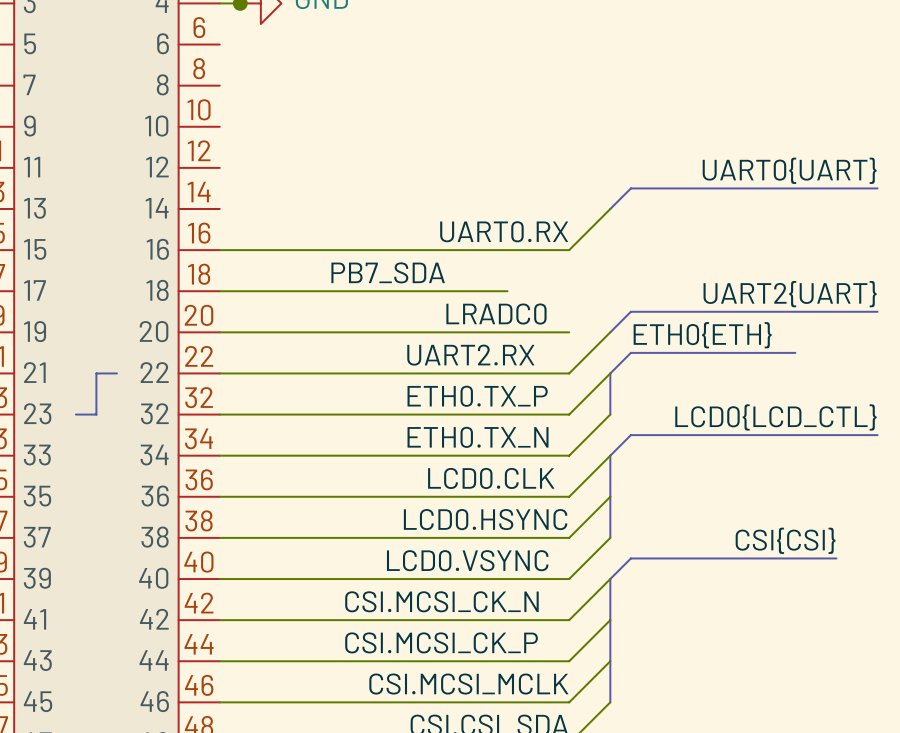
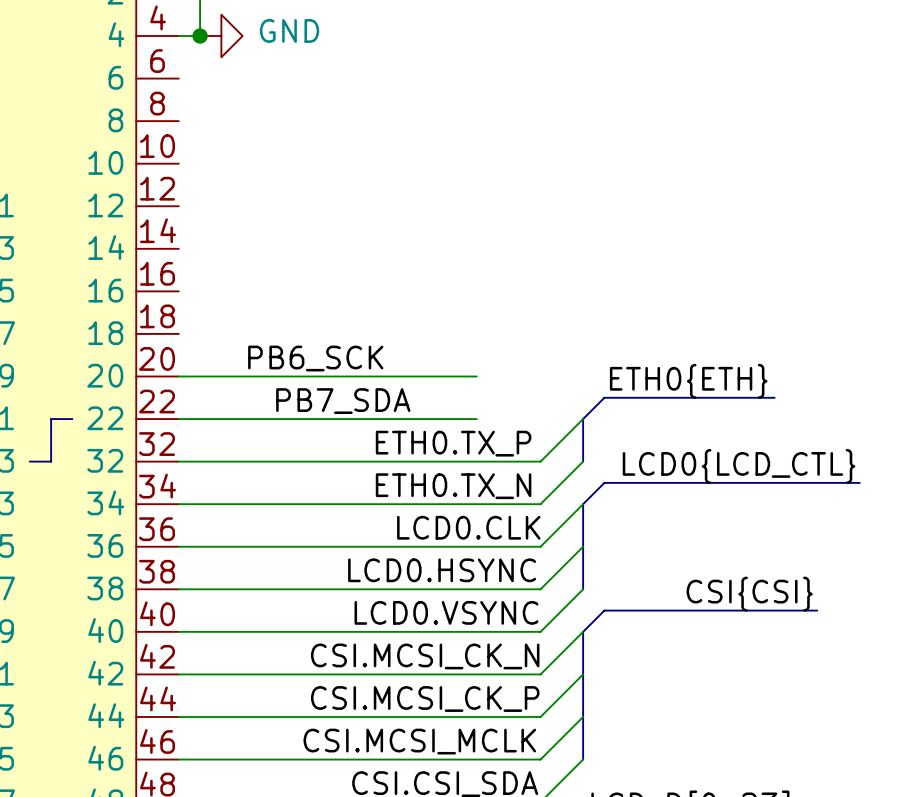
label: UART0{UART} (789, 170) -> none
bus: (877, 188) (630, 188) (610, 209) -> none
wire: (610, 209) (569, 250) (219, 250) -> none
label: UART0.RX (504, 231) -> none
label position: PB7_SDA (388, 272) -> PB7_SDA (343, 401)
wire: (219, 291) (507, 291) -> none
label: UART2{UART} (790, 294) -> none
bus: (877, 311) (630, 311) (610, 332) -> none
label: none -> PB6_SCK (315, 358)
label: LRADC0 (496, 314) -> none
wire: (507, 332) (569, 332) -> none
wire: (610, 332) (569, 373) (507, 373) -> none
label: UART2.RX (470, 355) -> none

